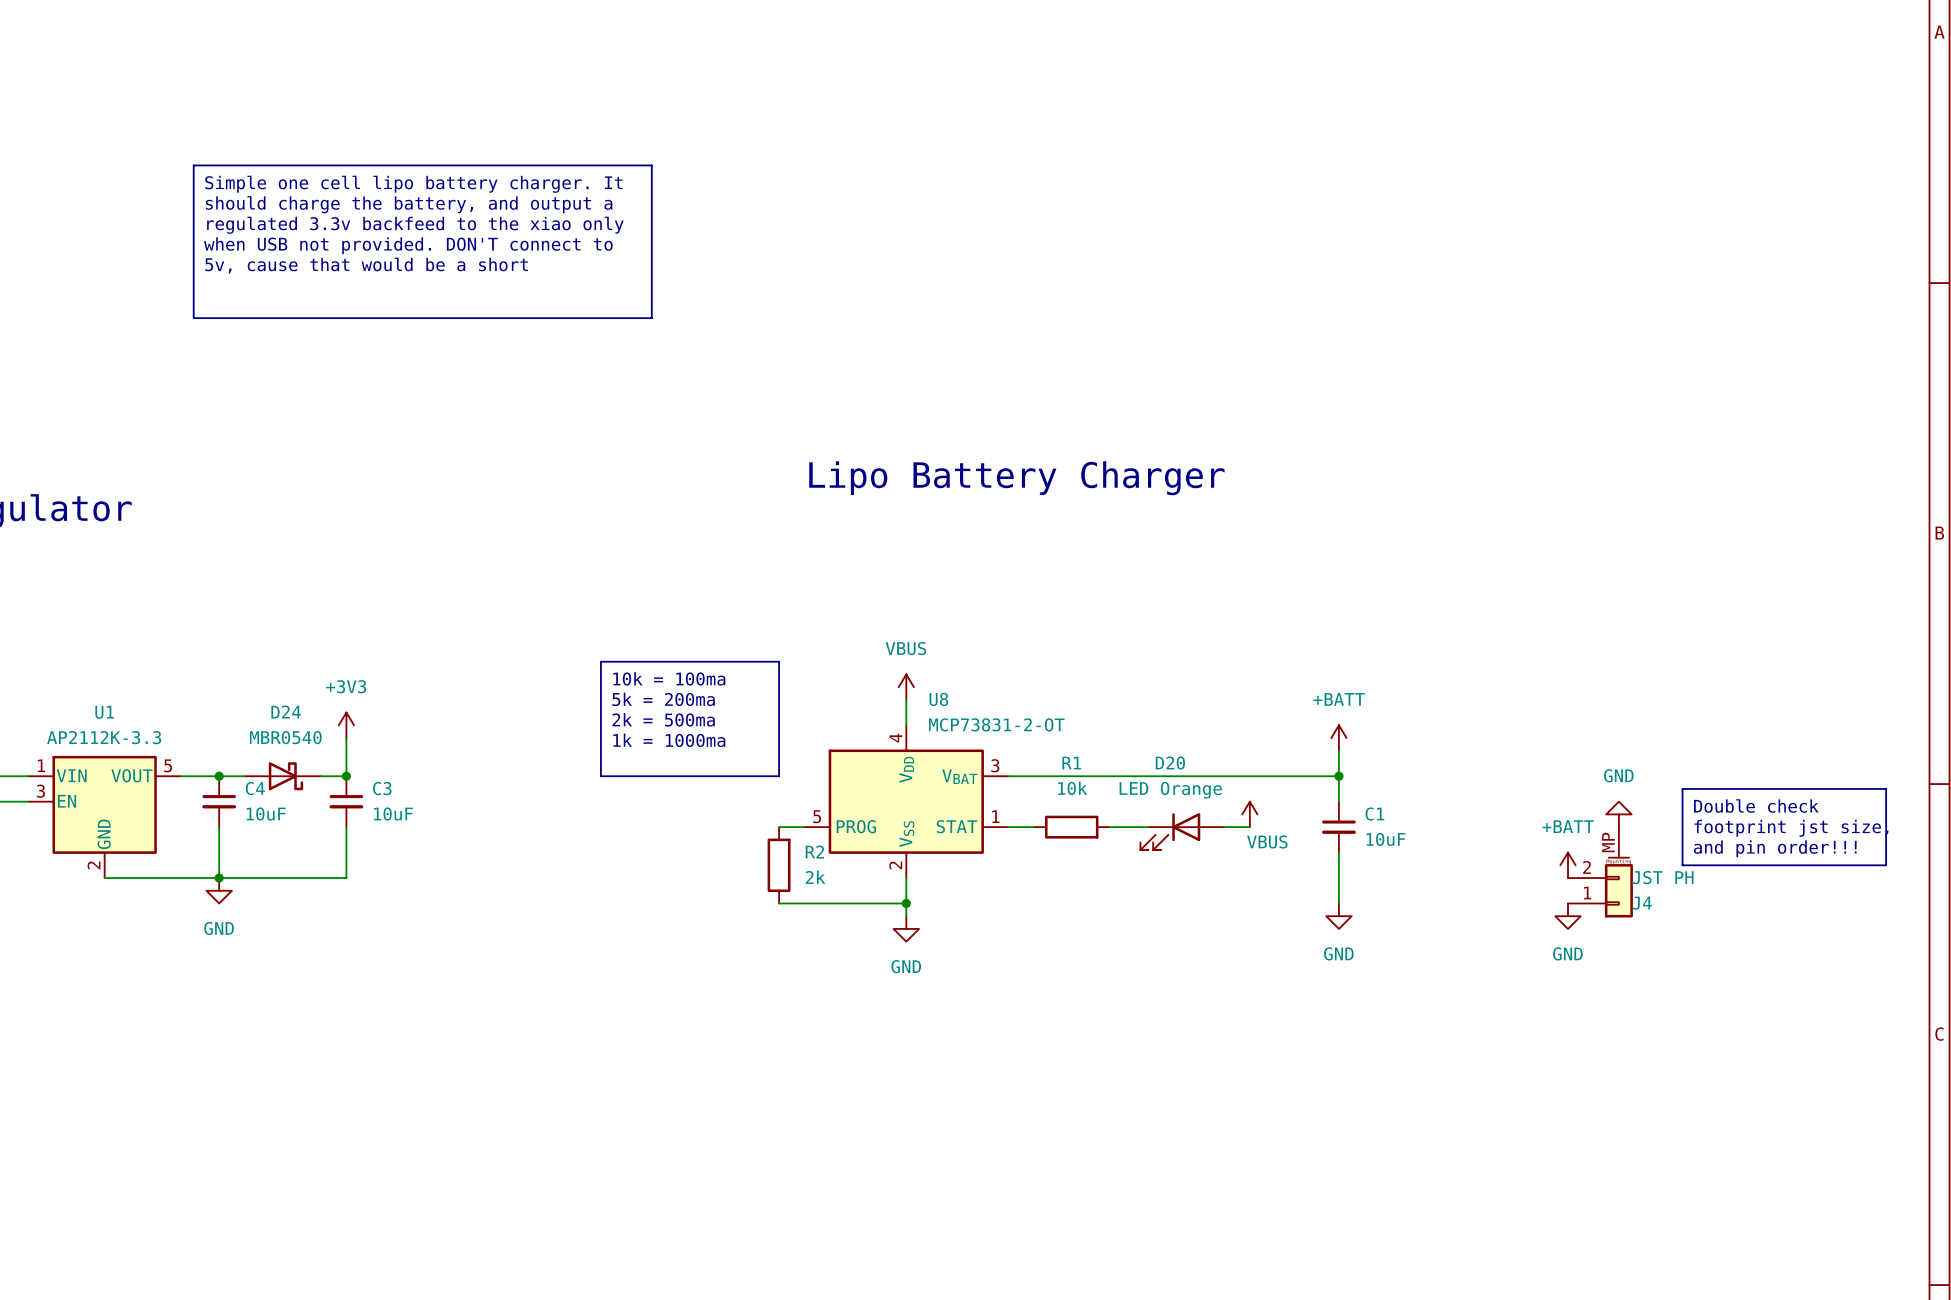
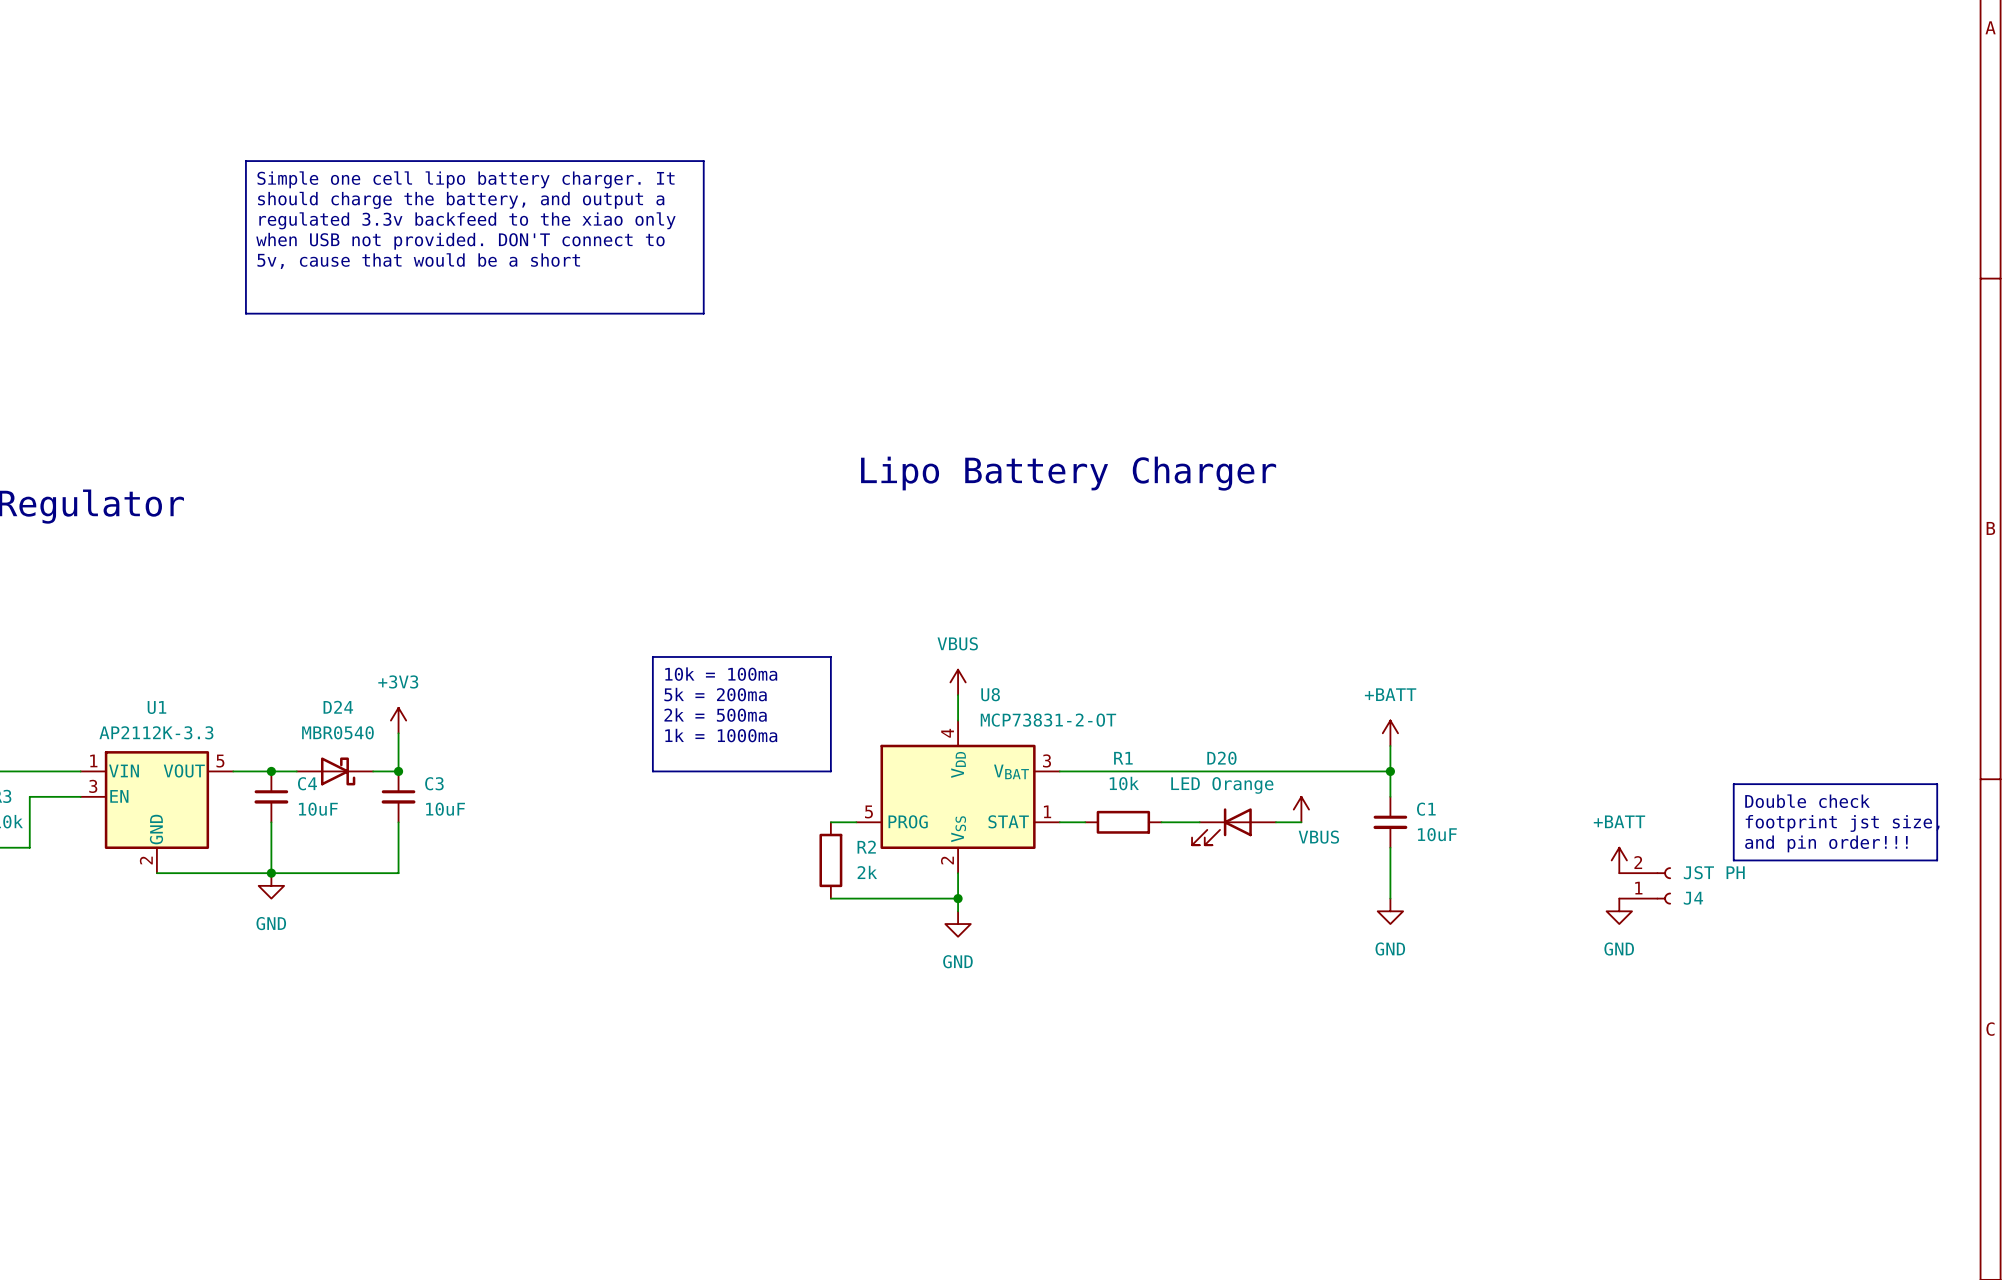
power symbol: GND (1618, 814) -> none
J4 symbol: [1568, 827, 1633, 918] -> [1619, 867, 1671, 905]

